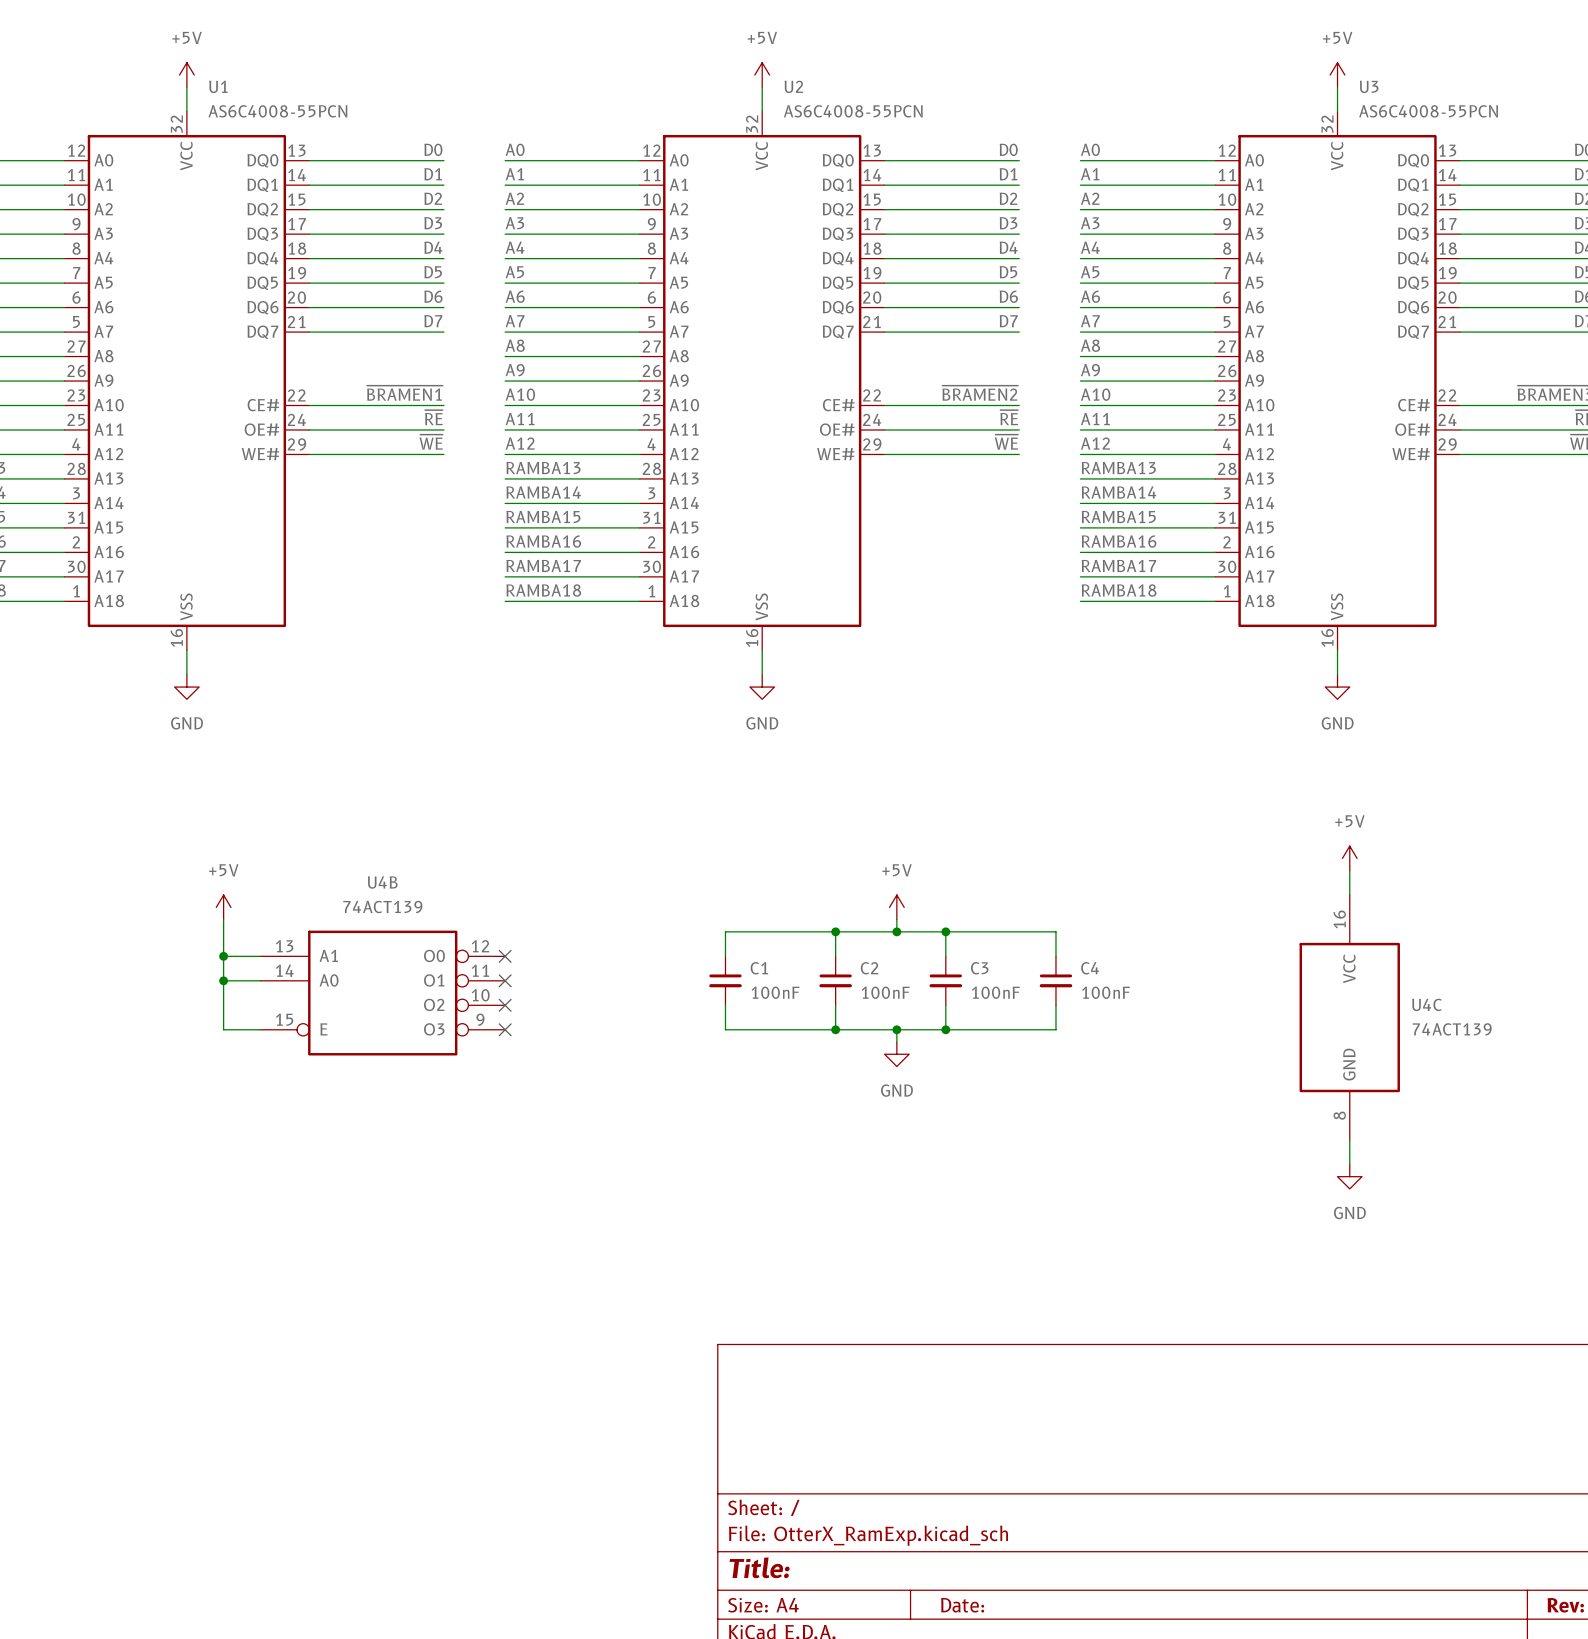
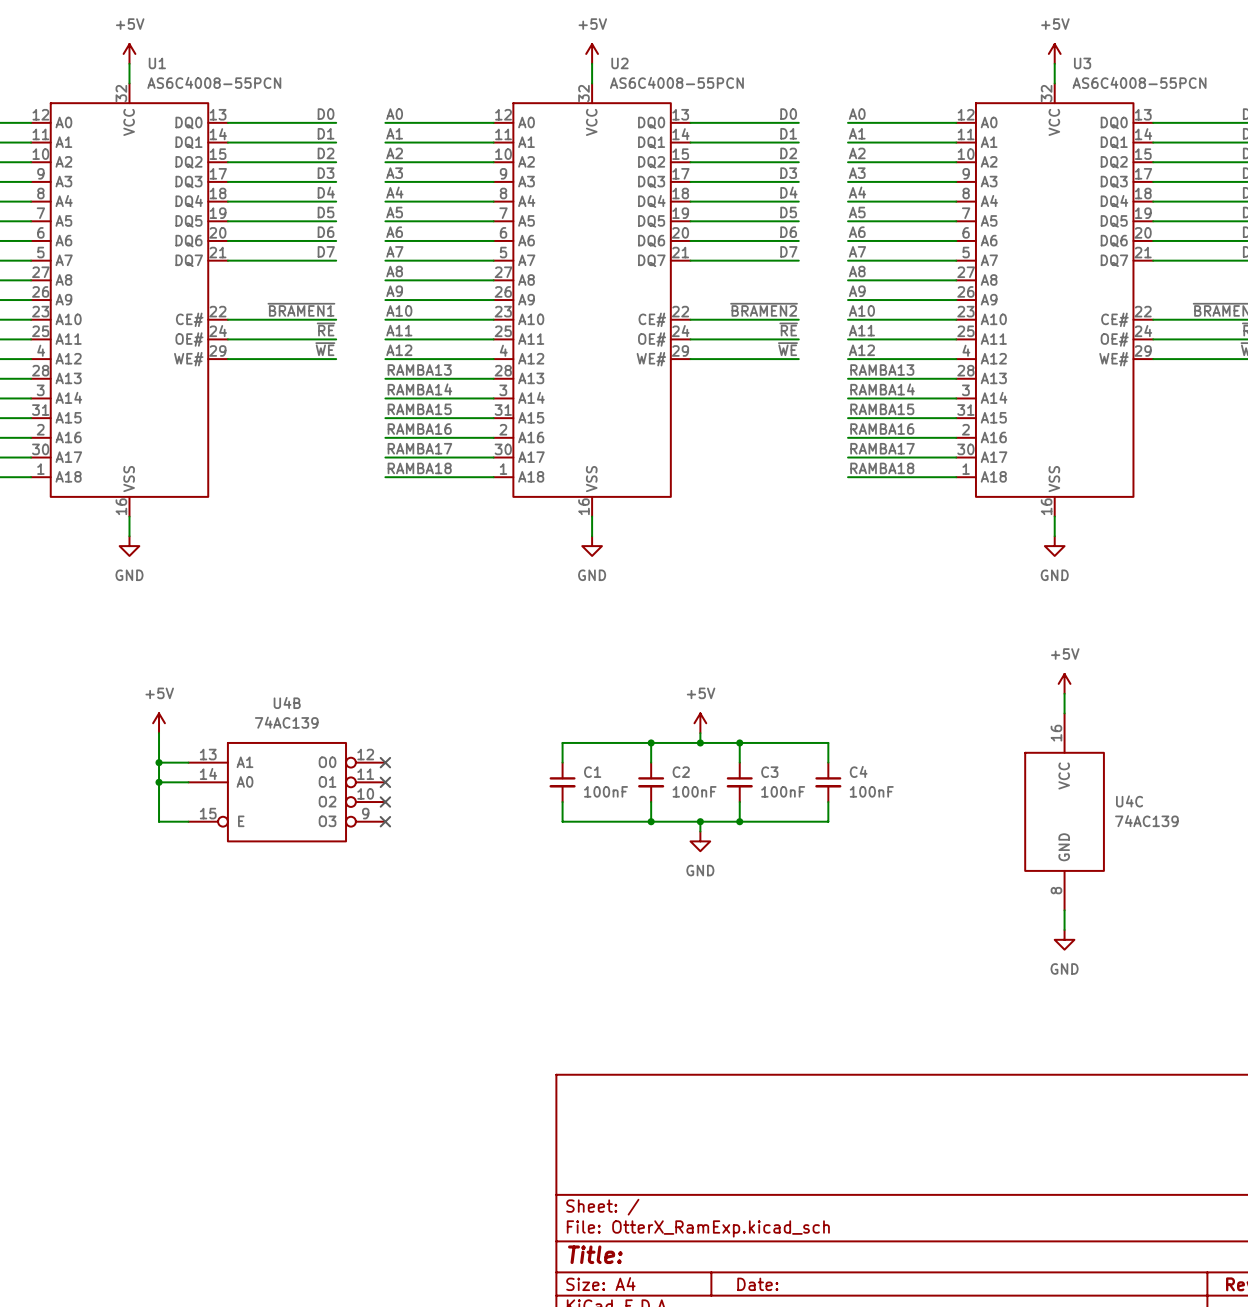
U4B value: 74ACT139 (382, 906) -> 74AC139 (286, 722)
U4C value: 74ACT139 (1452, 1029) -> 74AC139 (1146, 821)

